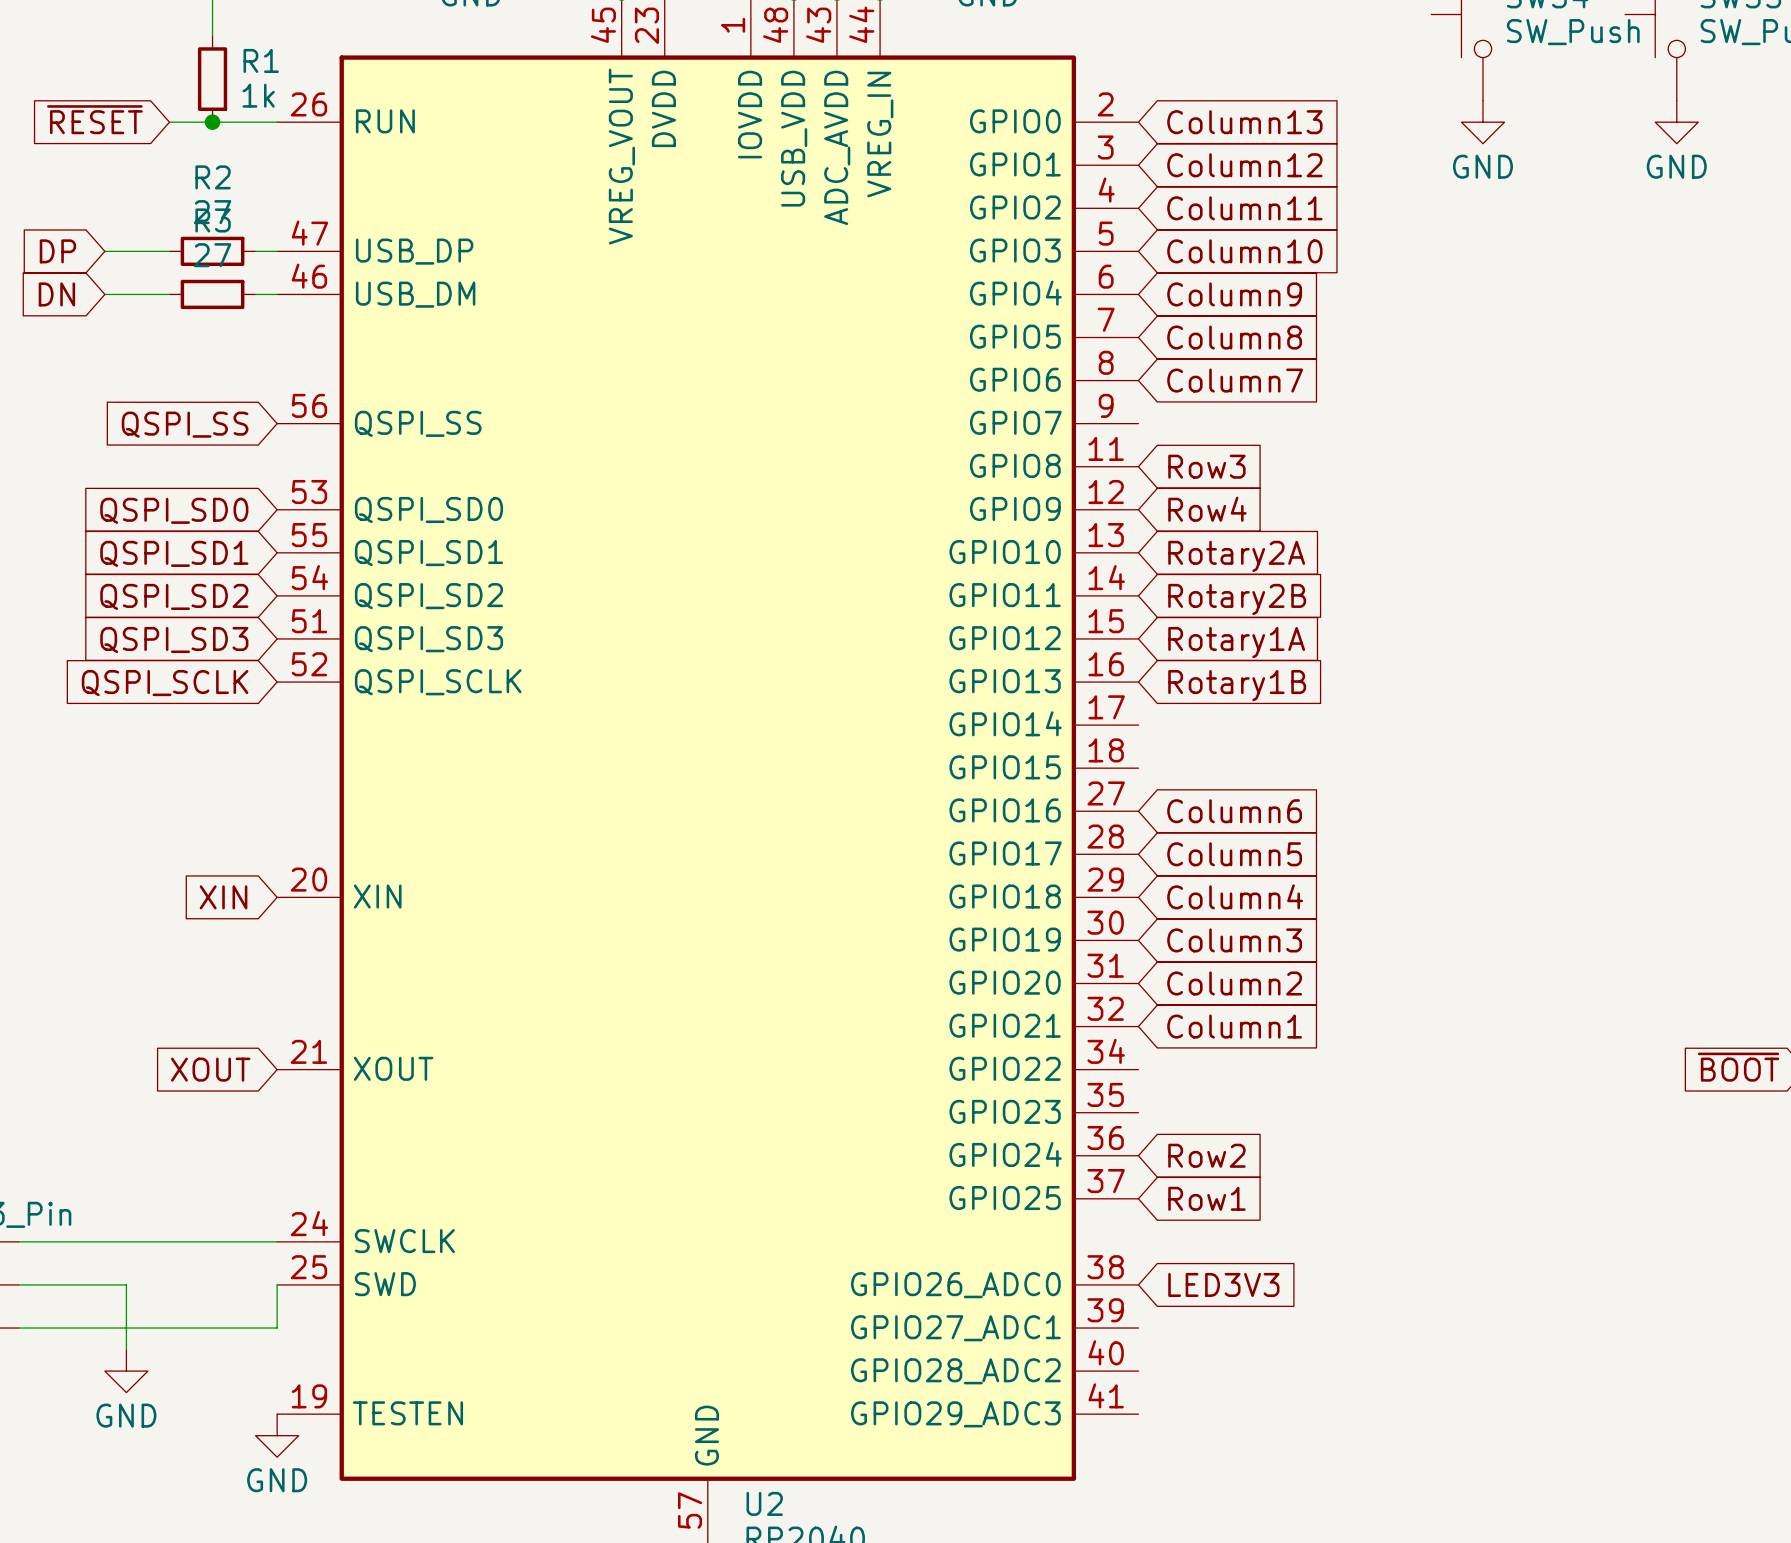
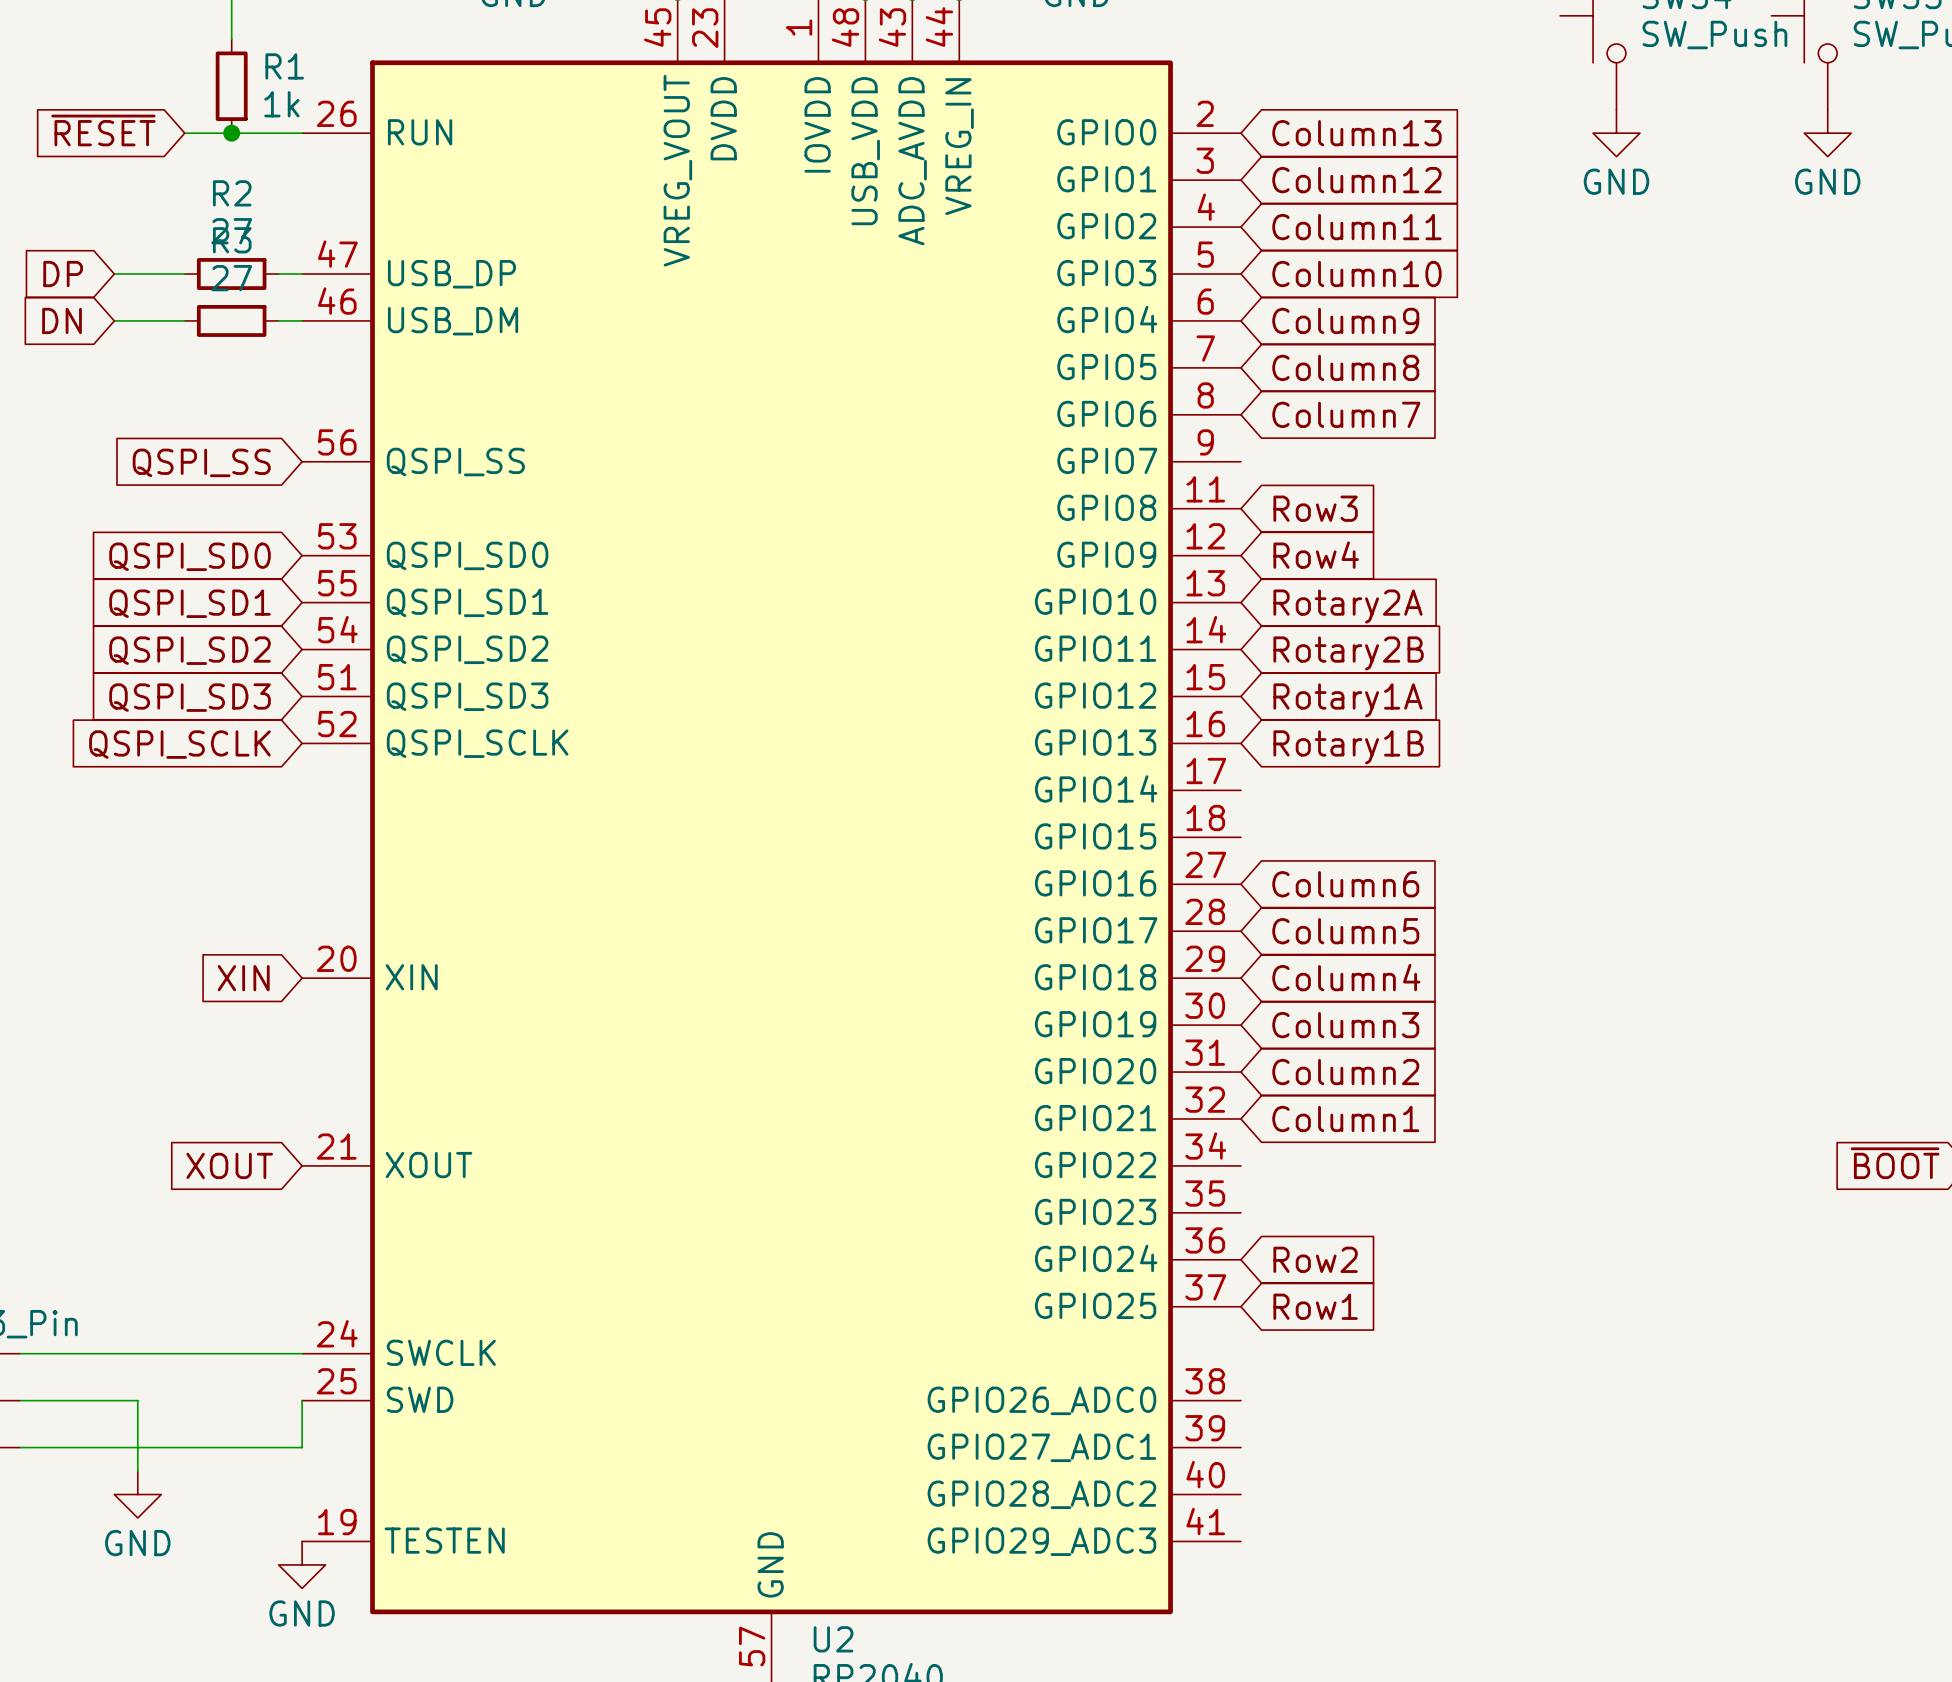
global label: LED3V3 (1223, 1284) -> none

